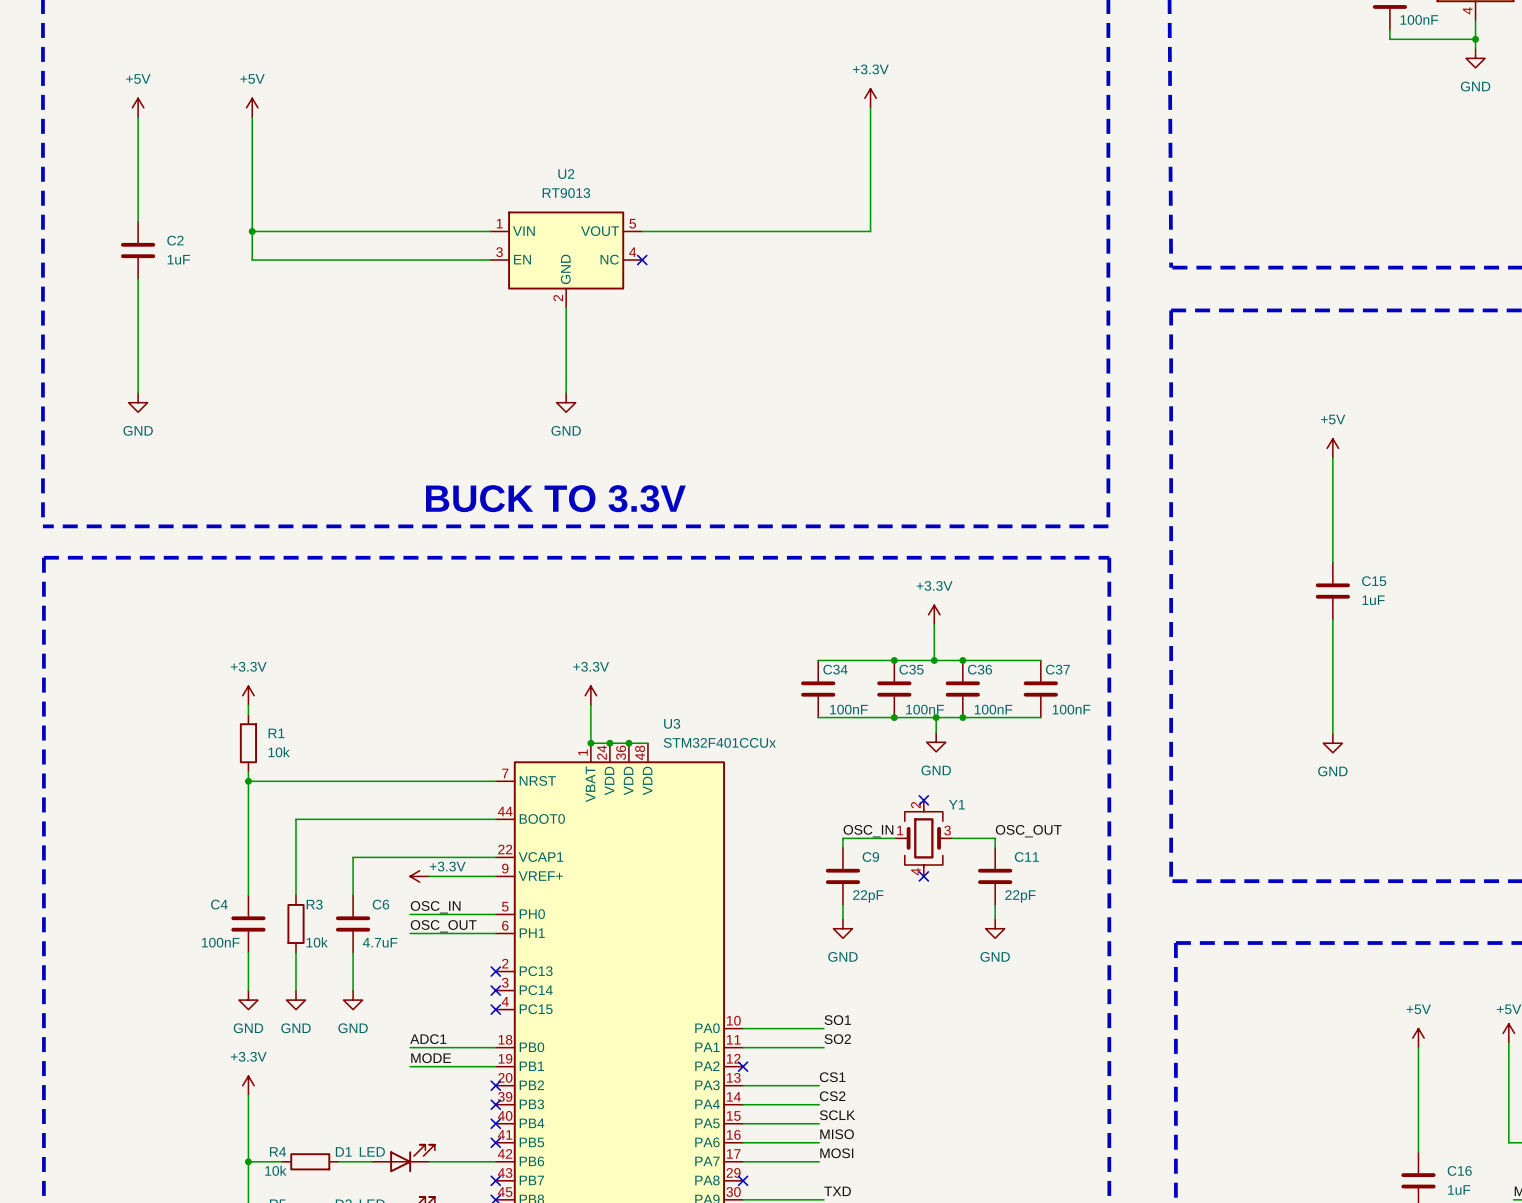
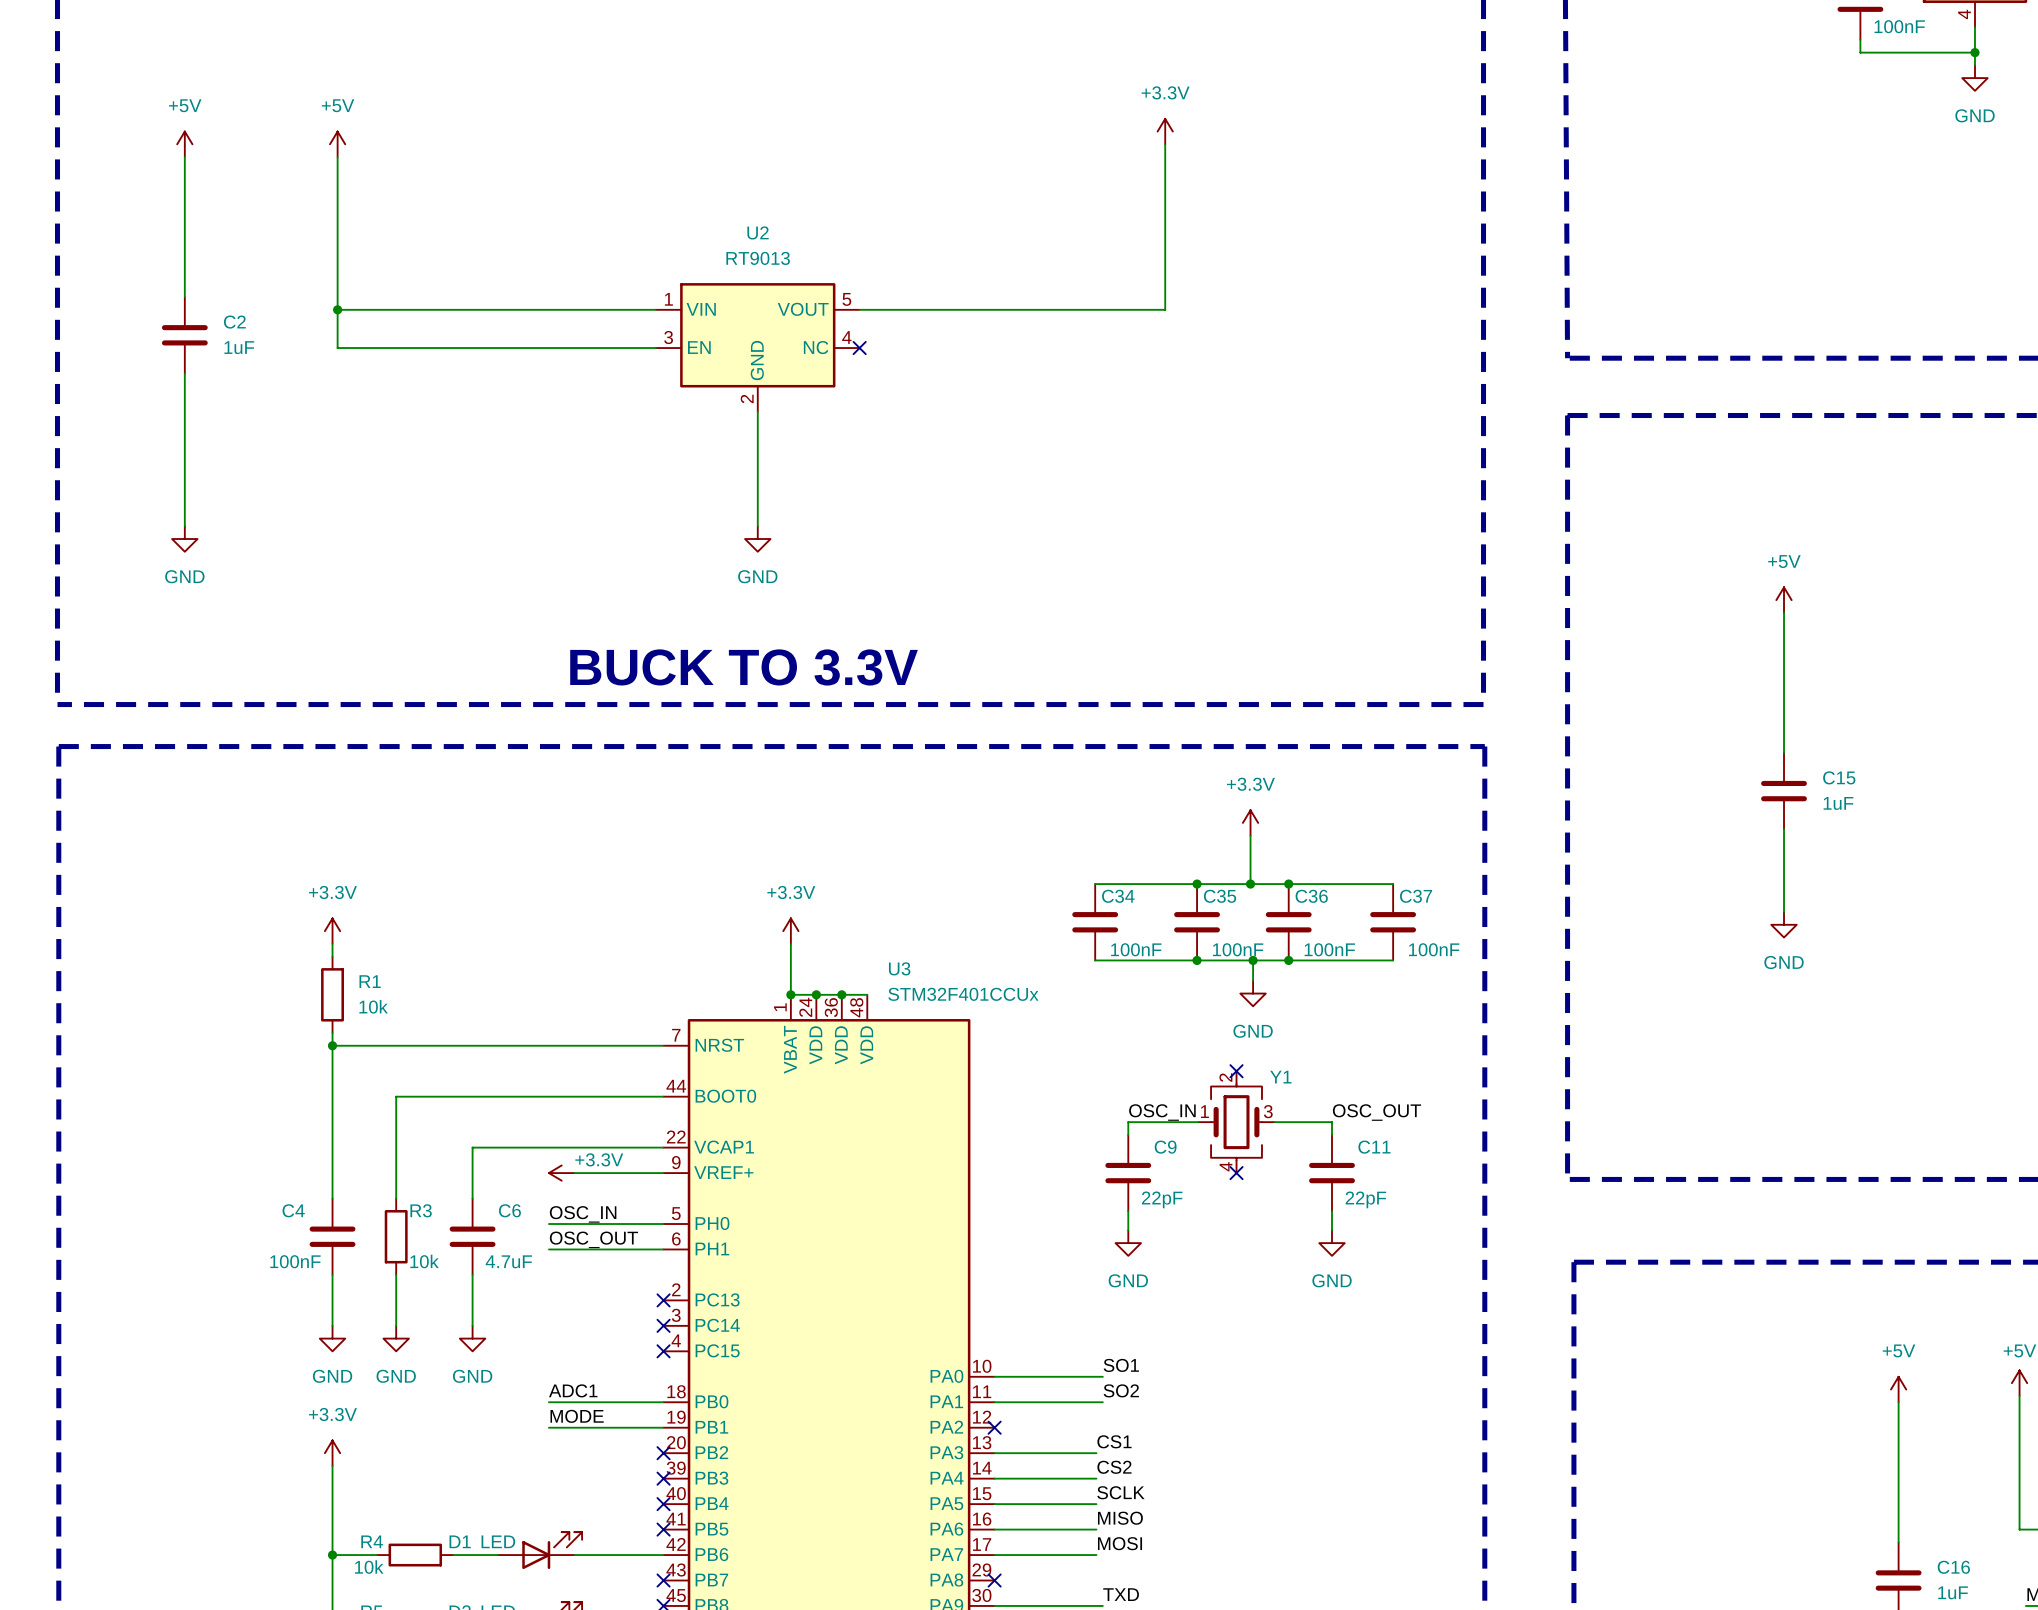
wire: (1332, 681) (1332, 733) -> none
power symbol position: GND (1332, 743) -> GND (1784, 924)

